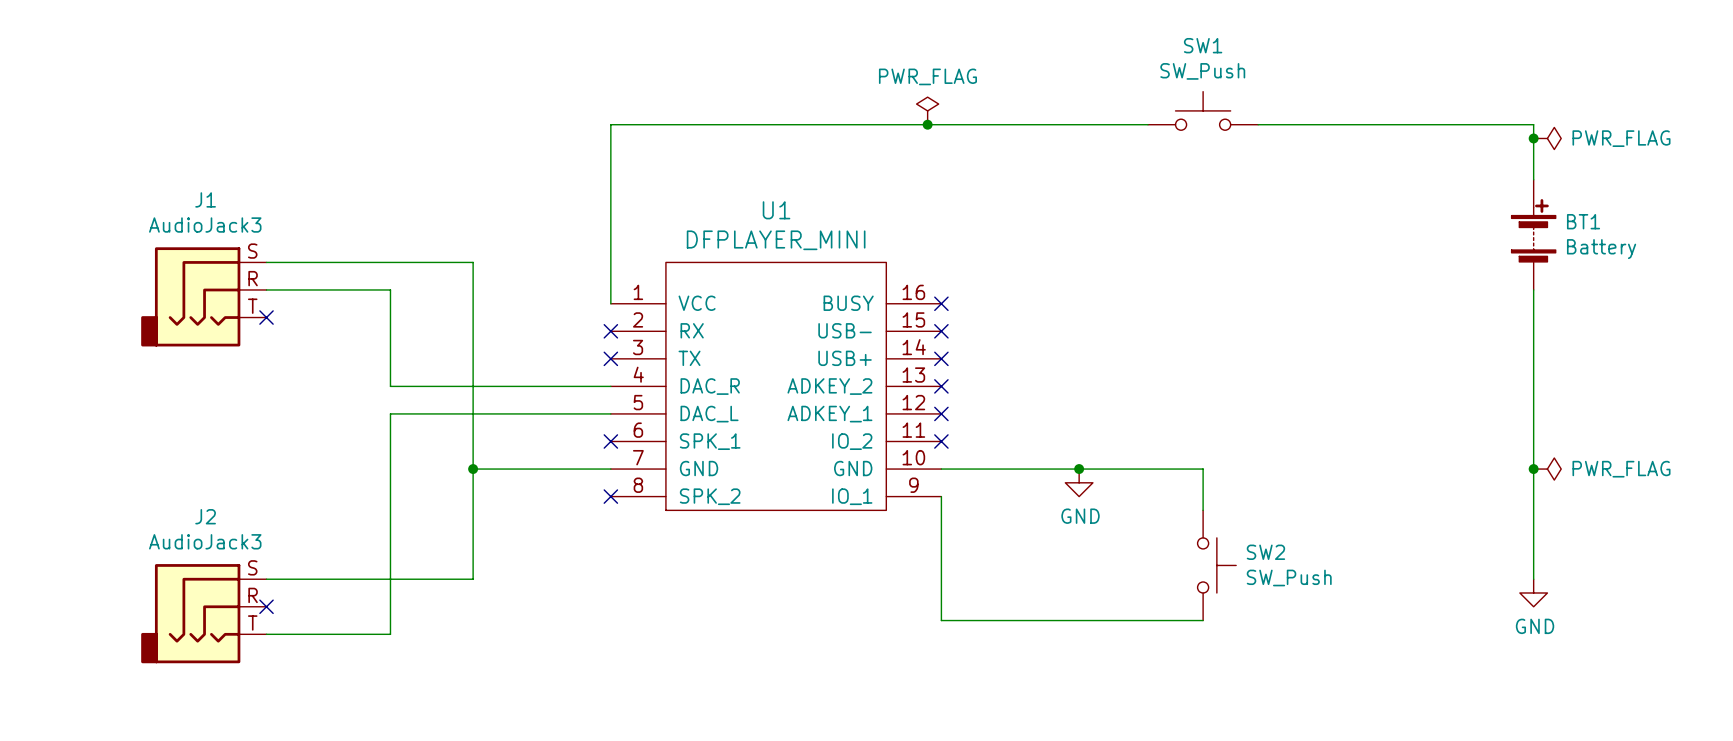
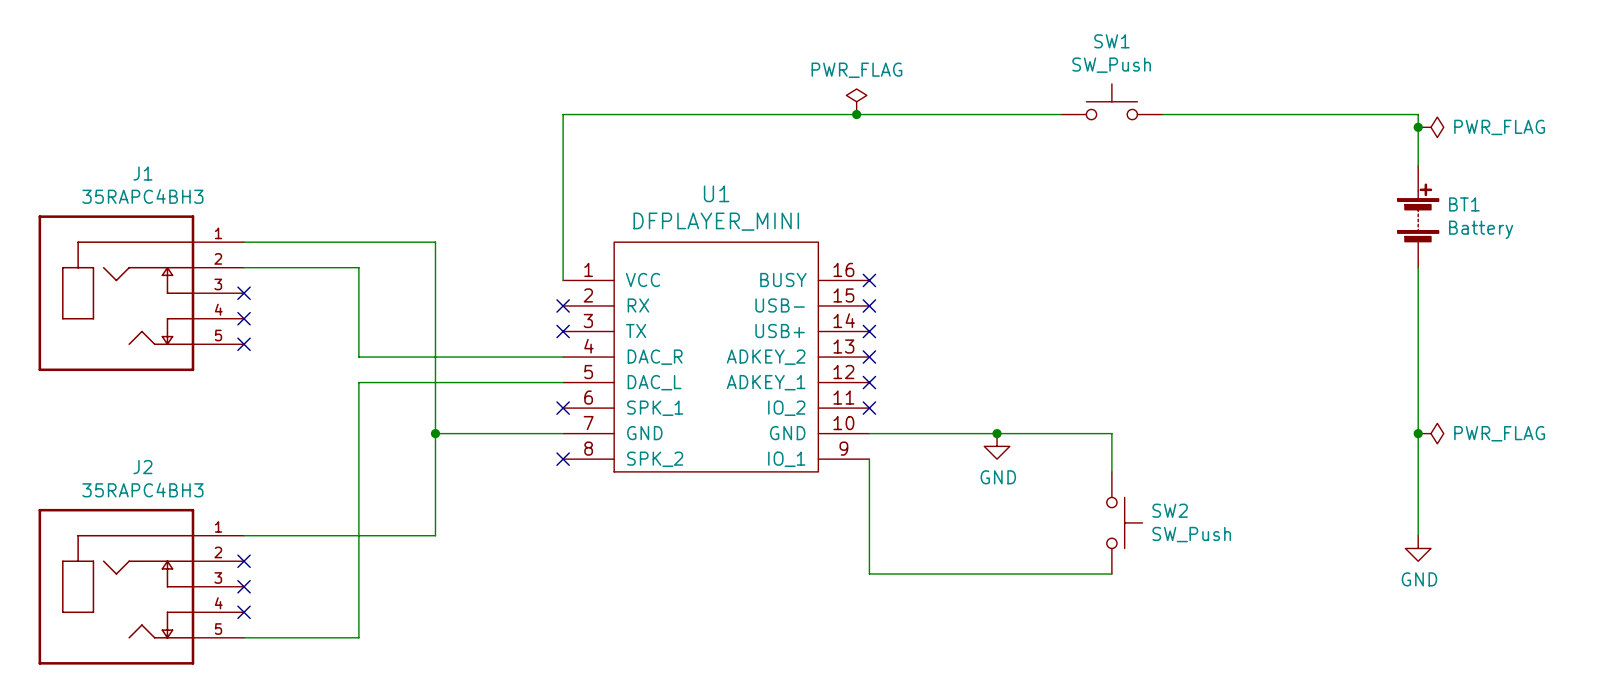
J1 name position: J1 (205, 199) -> J1 (142, 173)
J1 value: AudioJack3 (205, 225) -> 35RAPC4BH3 (142, 196)
J1 symbol: [141, 247, 267, 347] -> [38, 215, 245, 372]
no-connect mark: none -> (244, 318)
no-connect mark: none -> (244, 344)
J2 name position: J2 (205, 516) -> J2 (142, 467)
J2 value: AudioJack3 (205, 541) -> 35RAPC4BH3 (142, 490)
J2 symbol: [141, 564, 267, 664] -> [38, 508, 245, 665]
wire: (266, 634) (390, 634) -> (244, 637) (358, 637) (358, 586)
no-connect mark: none -> (244, 586)
no-connect mark: none -> (244, 612)

